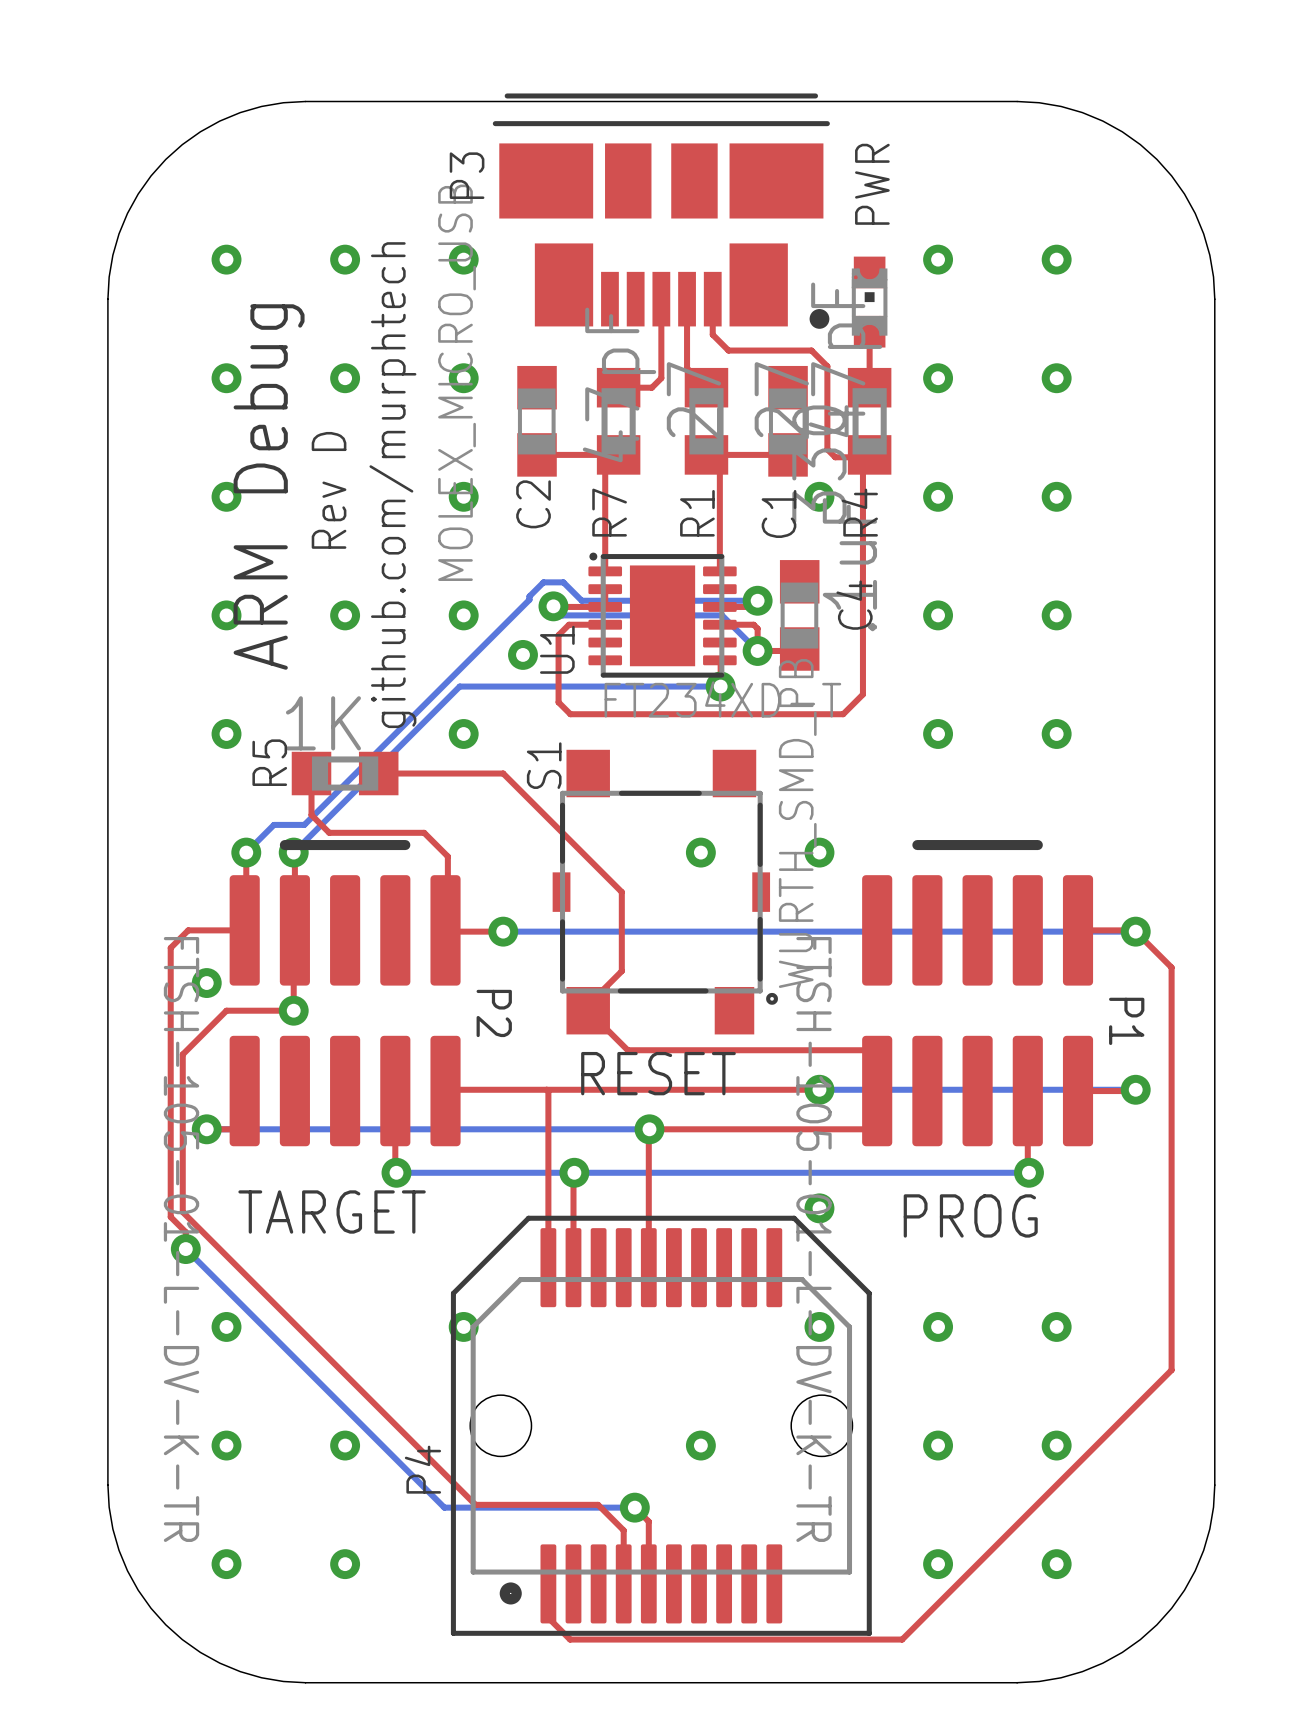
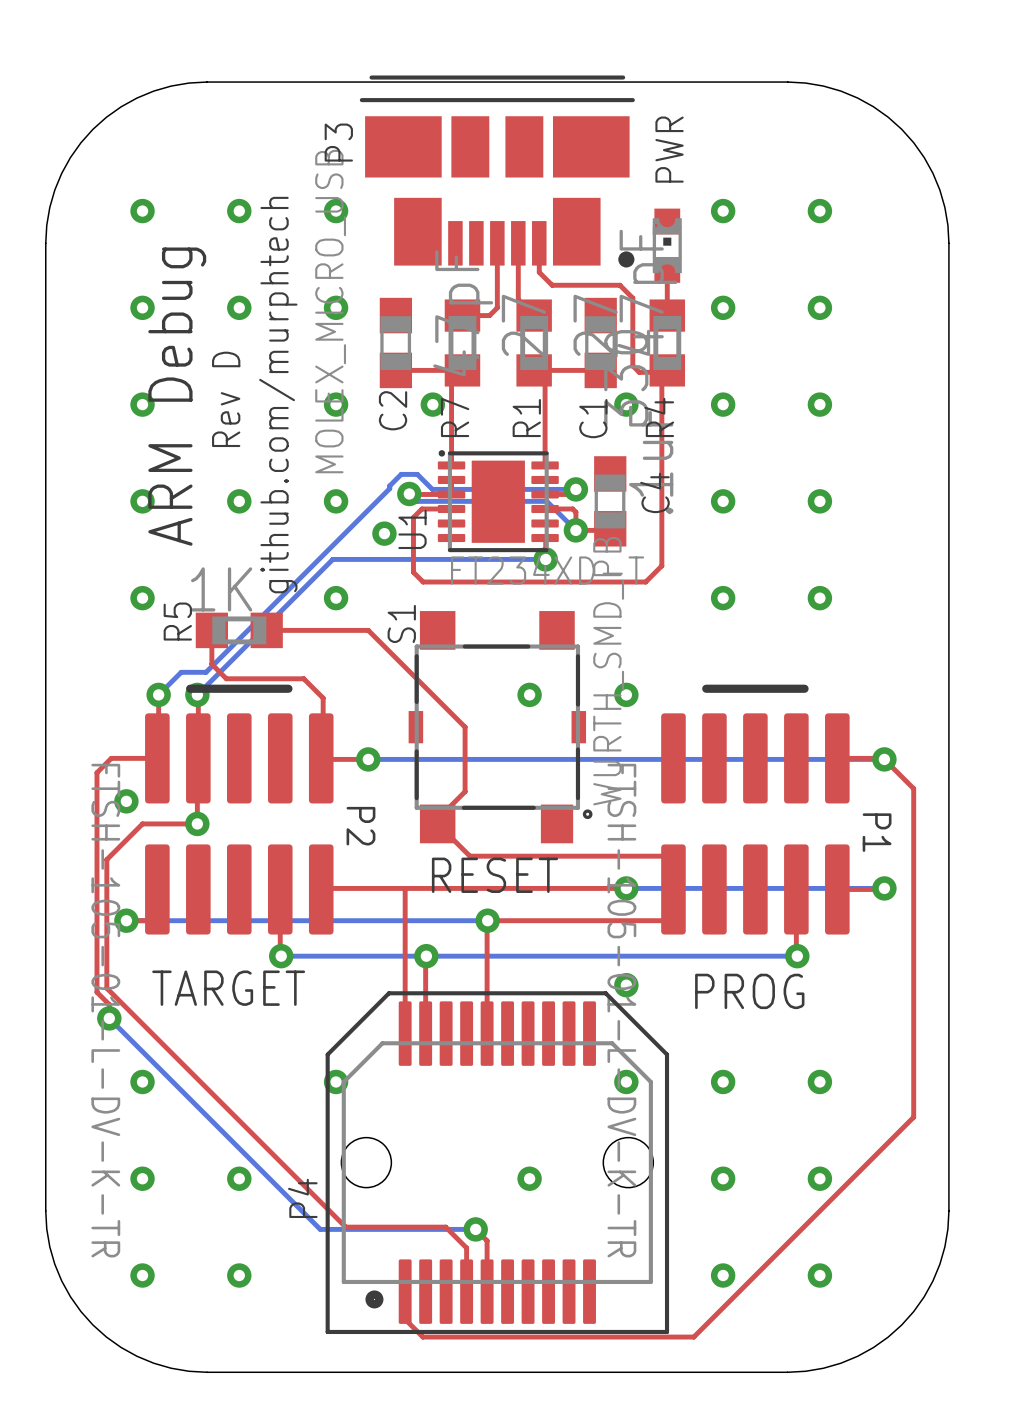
via: none -> (432, 404)

